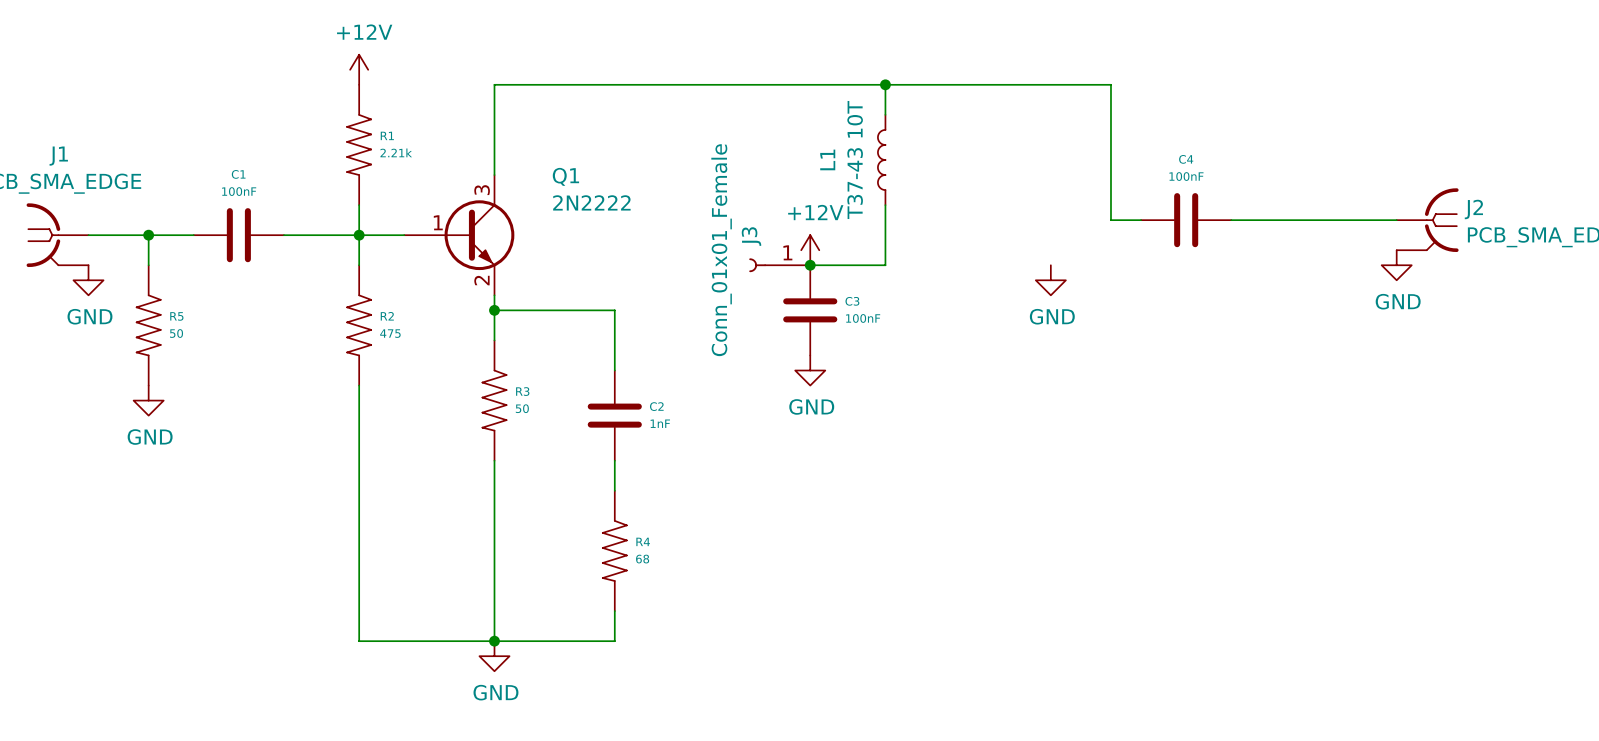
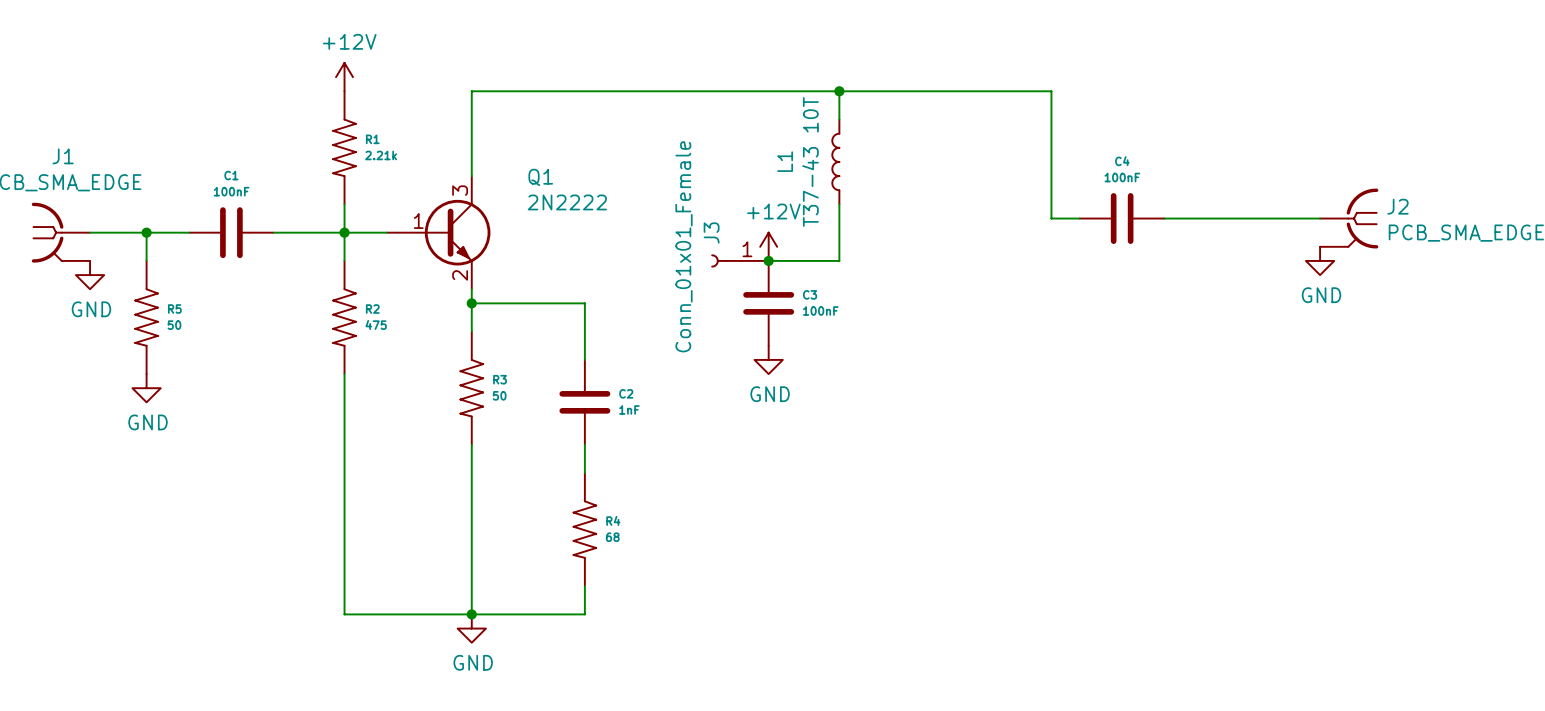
power symbol: GND (1050, 280) -> none

